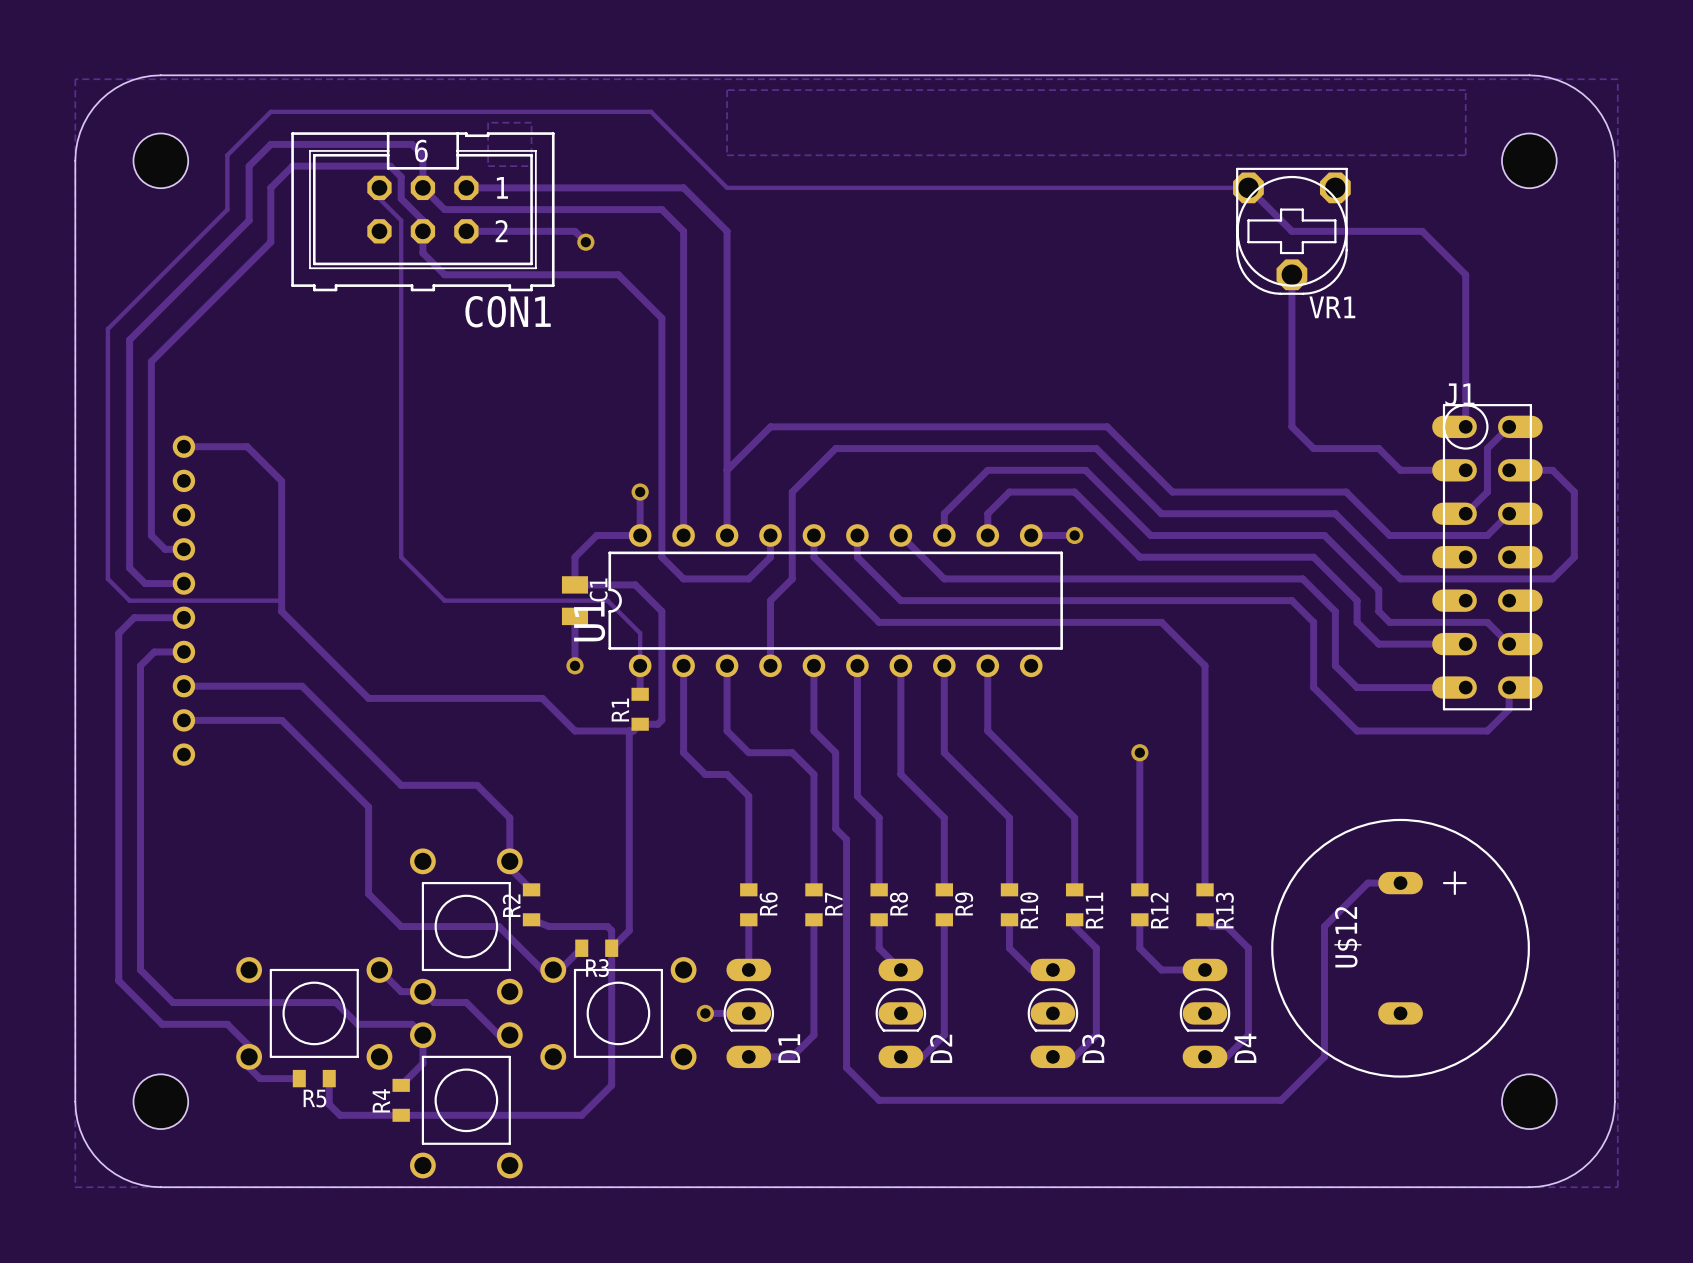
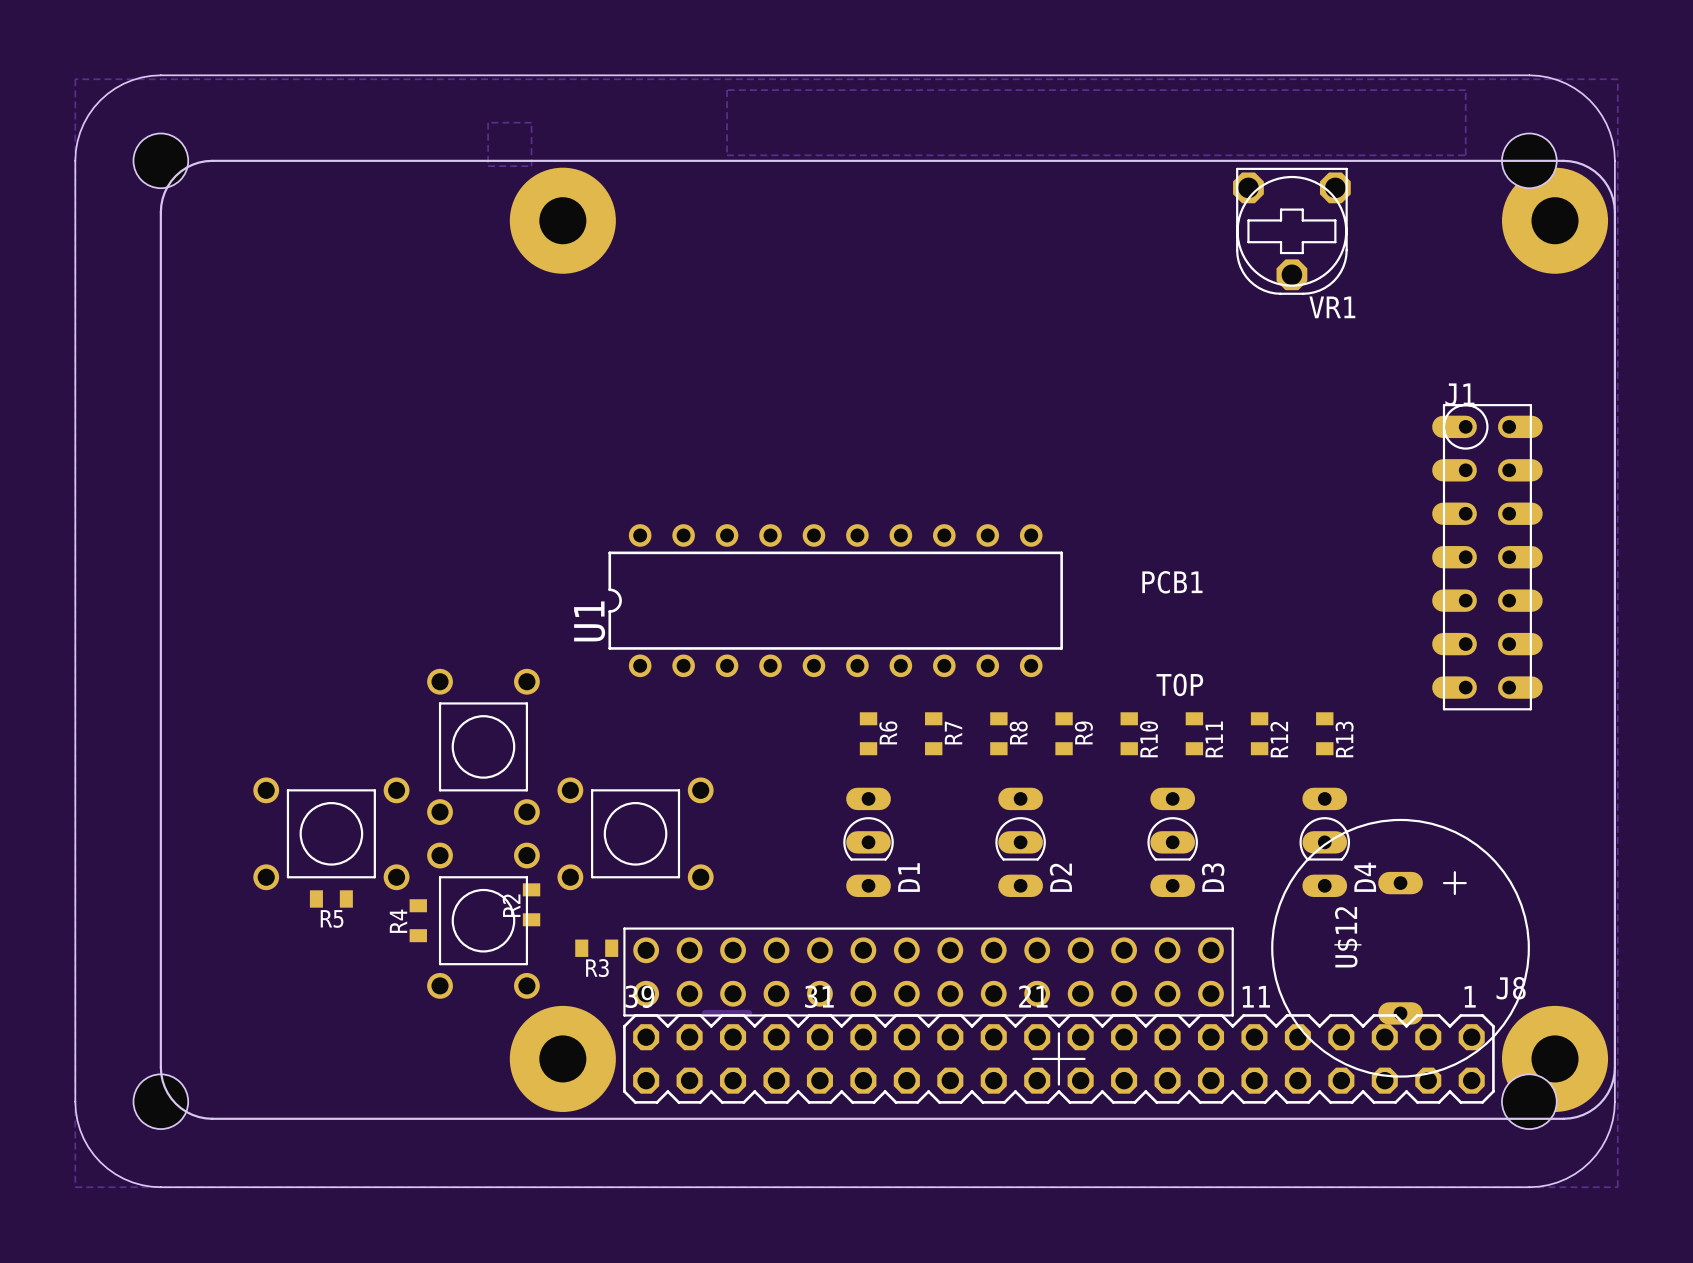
track: (379, 187) (379, 198) (401, 220) (401, 557) (444, 600) (607, 600) (640, 633) (640, 694) -> none
track: (466, 187) (683, 187) (727, 231) (727, 535) -> none
CON1: (422, 211) -> none
track: (466, 231) (574, 231) (585, 242) -> none
via: (585, 242) -> none
track: (1291, 274) (1291, 426) (1313, 448) (1378, 448) (1400, 470) (1465, 470) -> none
track: (1465, 426) (1465, 274) (1422, 231) (1291, 231) (1248, 187) (727, 187) (651, 111) (270, 111) (227, 155) (227, 209) (107, 329) (107, 578) (129, 600) (281, 600) -> none
track: (1509, 426) (1487, 448) (1487, 492) (1465, 513) -> none
track: (183, 446) (247, 446) (281, 481) (281, 611) (368, 698) (542, 698) (574, 731) (633, 731) (640, 724) (657, 724) (661, 720) (661, 611) (635, 584) (574, 584) (574, 557) (596, 535) (640, 535) (640, 492) -> none
track: (727, 470) (770, 426) (1107, 426) (1172, 492) (1346, 492) (1389, 535) (1487, 535) (1509, 513) -> none
track: (1509, 470) (1552, 470) (1574, 492) (1574, 557) (1552, 578) (1400, 578) (1335, 513) (1161, 513) (1096, 448) (835, 448) (792, 492) (792, 578) (770, 600) (770, 665) -> none
via: (640, 492) -> none
track: (683, 535) (683, 231) (661, 209) (444, 209) (422, 187) (422, 155) (412, 144) (270, 144) (249, 166) (249, 220) (129, 339) (129, 568) (145, 583) (183, 583) -> none
track: (770, 535) (770, 557) (748, 578) (683, 578) (661, 557) (661, 318) (618, 274) (444, 274) (422, 253) (422, 220) (401, 198) (401, 177) (390, 166) (292, 166) (270, 187) (270, 242) (151, 361) (151, 535) (165, 549) (183, 549) -> none
track: (813, 535) (813, 557) (879, 622) (1161, 622) (1205, 665) (1205, 889) -> none
track: (857, 535) (857, 557) (900, 600) (1291, 600) (1313, 622) (1313, 687) (1357, 731) (1487, 731) (1509, 709) (1509, 687) -> none
track: (900, 535) (944, 578) (1302, 578) (1335, 611) (1335, 665) (1357, 687) (1465, 687) -> none
track: (944, 535) (944, 513) (987, 470) (1085, 470) (1150, 535) (1324, 535) (1378, 589) (1378, 611) (1389, 622) (1487, 622) (1509, 644) -> none
track: (987, 535) (987, 513) (1009, 492) (1074, 492) (1139, 557) (1313, 557) (1357, 600) (1357, 622) (1378, 644) (1465, 644) -> none
track: (1031, 535) (1074, 535) -> none
via: (1074, 535) -> none
part: (183, 600) -> none
C1: (574, 600) -> none
track: (574, 616) (574, 665) -> none
track: (183, 617) (134, 617) (118, 633) (118, 980) (162, 1024) (227, 1024) (249, 1046) (249, 1067) (259, 1078) (299, 1078) -> none
PCB1: none -> (887, 639)
track: (183, 651) (154, 651) (140, 665) (140, 969) (173, 1002) (336, 1002) (357, 1024) (412, 1024) (422, 1035) (422, 1063) (401, 1085) -> none
via: (574, 665) -> none
track: (683, 665) (683, 752) (705, 774) (727, 774) (748, 796) (748, 889) -> none
track: (727, 665) (727, 731) (748, 752) (792, 752) (813, 774) (813, 889) -> none
track: (813, 665) (813, 731) (835, 752) (835, 828) (846, 839) (846, 1067) (879, 1100) (1281, 1100) (1324, 1056) (1324, 926) (1367, 883) (1400, 883) -> none
track: (857, 665) (857, 796) (879, 817) (879, 889) -> none
track: (900, 665) (900, 774) (944, 817) (944, 889) -> none
track: (944, 665) (944, 752) (1009, 817) (1009, 889) -> none
track: (987, 665) (987, 731) (1074, 817) (1074, 889) -> none
track: (183, 686) (302, 686) (401, 785) (477, 785) (509, 817) (509, 868) (531, 889) -> none
R1: (640, 709) -> none
track: (183, 720) (281, 720) (368, 807) (368, 893) (401, 926) (498, 926) (542, 969) (560, 969) (581, 948) -> none
track: (629, 731) (629, 930) (611, 948) -> none
part: none -> (483, 746)
track: (1139, 752) (1139, 889) -> none
via: (1139, 752) -> none
part: none -> (331, 833)
part: none -> (635, 833)
R6 position: (748, 904) -> (868, 733)
R7 position: (813, 904) -> (933, 733)
R8 position: (879, 904) -> (998, 733)
R9 position: (944, 904) -> (1064, 733)
R10 position: (1009, 904) -> (1129, 733)
R11 position: (1074, 904) -> (1194, 733)
R12 position: (1139, 904) -> (1259, 733)
R13 position: (1205, 904) -> (1324, 733)
track: (531, 919) (549, 926) (607, 926) (611, 930) (611, 1085) (581, 1115) (340, 1115) (329, 1104) (329, 1078) -> none
track: (748, 919) (748, 969) -> none
track: (813, 919) (813, 1035) (792, 1056) (748, 1056) -> none
track: (879, 919) (879, 948) (900, 969) -> none
track: (944, 919) (944, 1035) (922, 1056) (900, 1056) -> none
track: (1009, 919) (1009, 948) (1031, 969) (1052, 969) -> none
track: (1074, 919) (1074, 926) (1096, 948) (1096, 1035) (1074, 1056) (1052, 1056) -> none
track: (1139, 919) (1139, 948) (1161, 969) (1205, 969) -> none
track: (1205, 919) (1211, 926) (1226, 926) (1248, 948) (1248, 1035) (1226, 1056) (1205, 1056) -> none
part position: (466, 926) -> (483, 920)
track: (379, 969) (401, 991) (422, 991) (433, 1002) (466, 1002) (498, 1035) (509, 1035) -> none
part: none -> (928, 972)
part: (314, 1013) -> none
part: (618, 1013) -> none
via: (705, 1013) -> none
D1 position: (748, 1013) -> (868, 842)
D2 position: (900, 1013) -> (1020, 842)
D3 position: (1052, 1013) -> (1172, 842)
D4 position: (1205, 1013) -> (1324, 842)
R5 position: (314, 1078) -> (331, 898)
R4 position: (401, 1100) -> (418, 920)
part: (466, 1100) -> none

